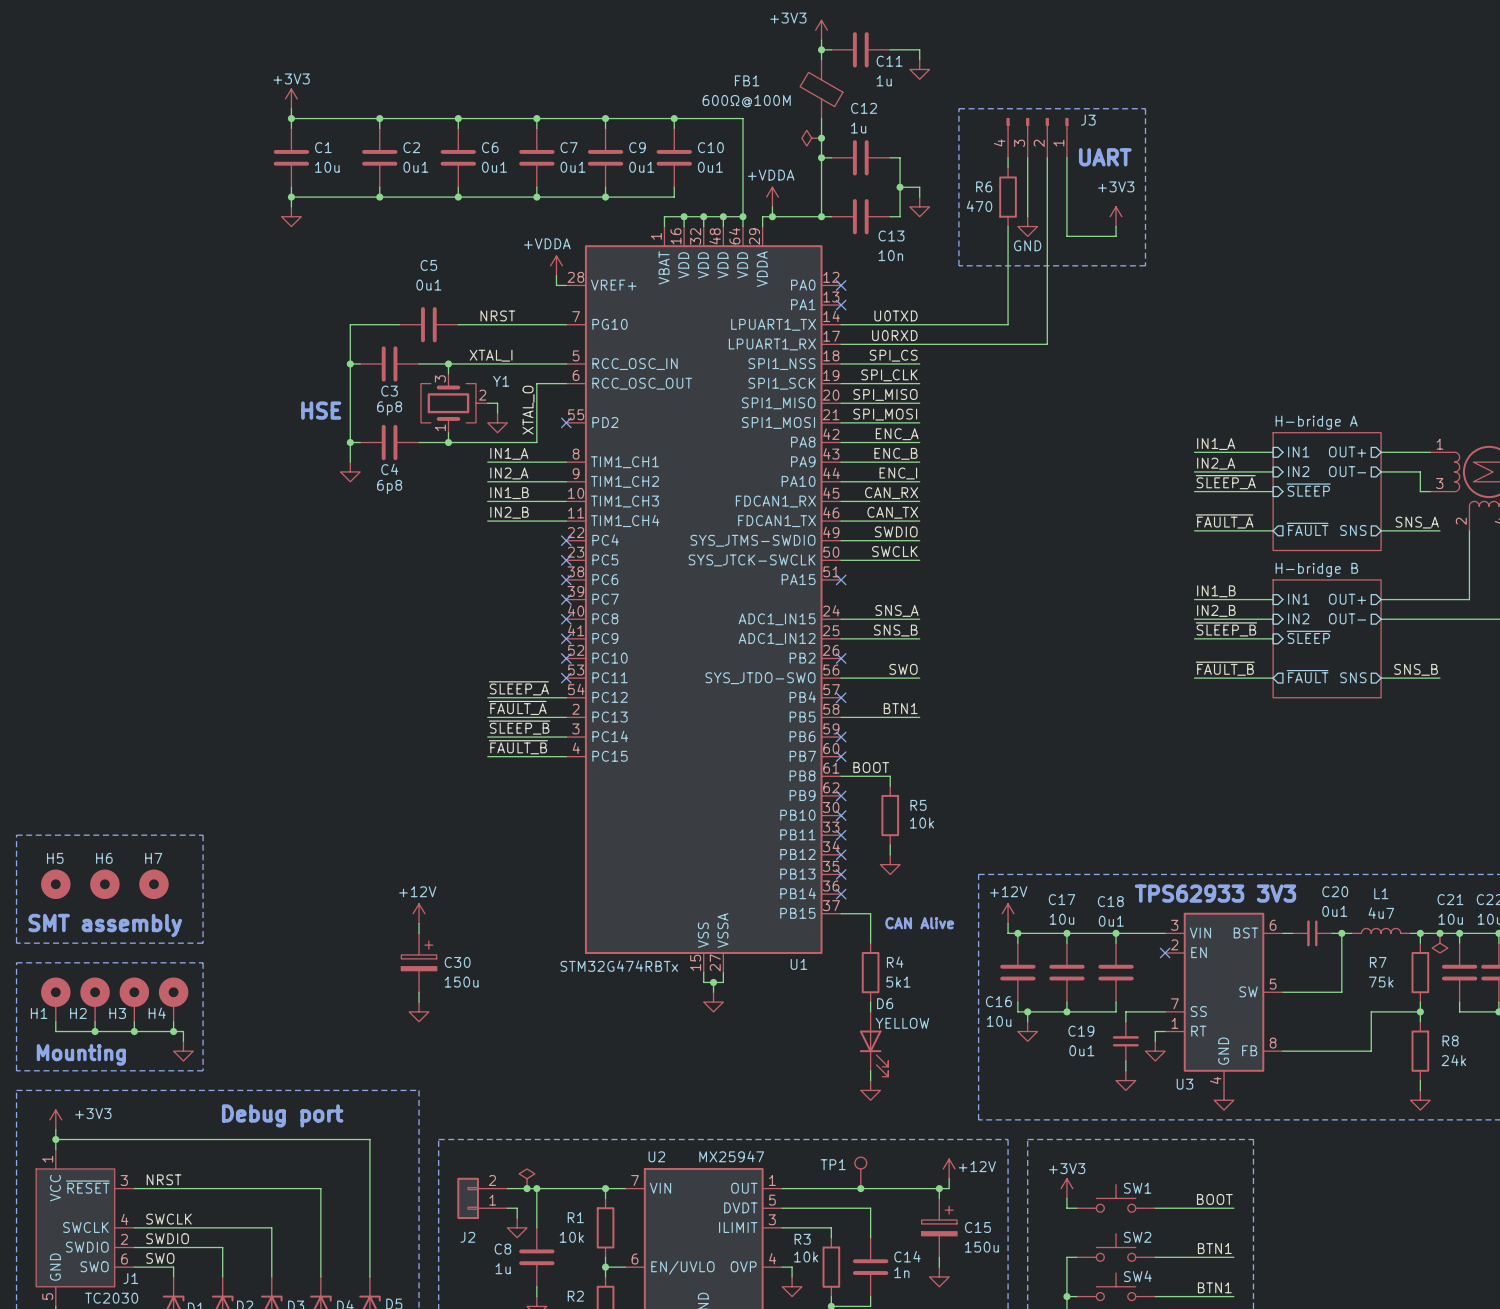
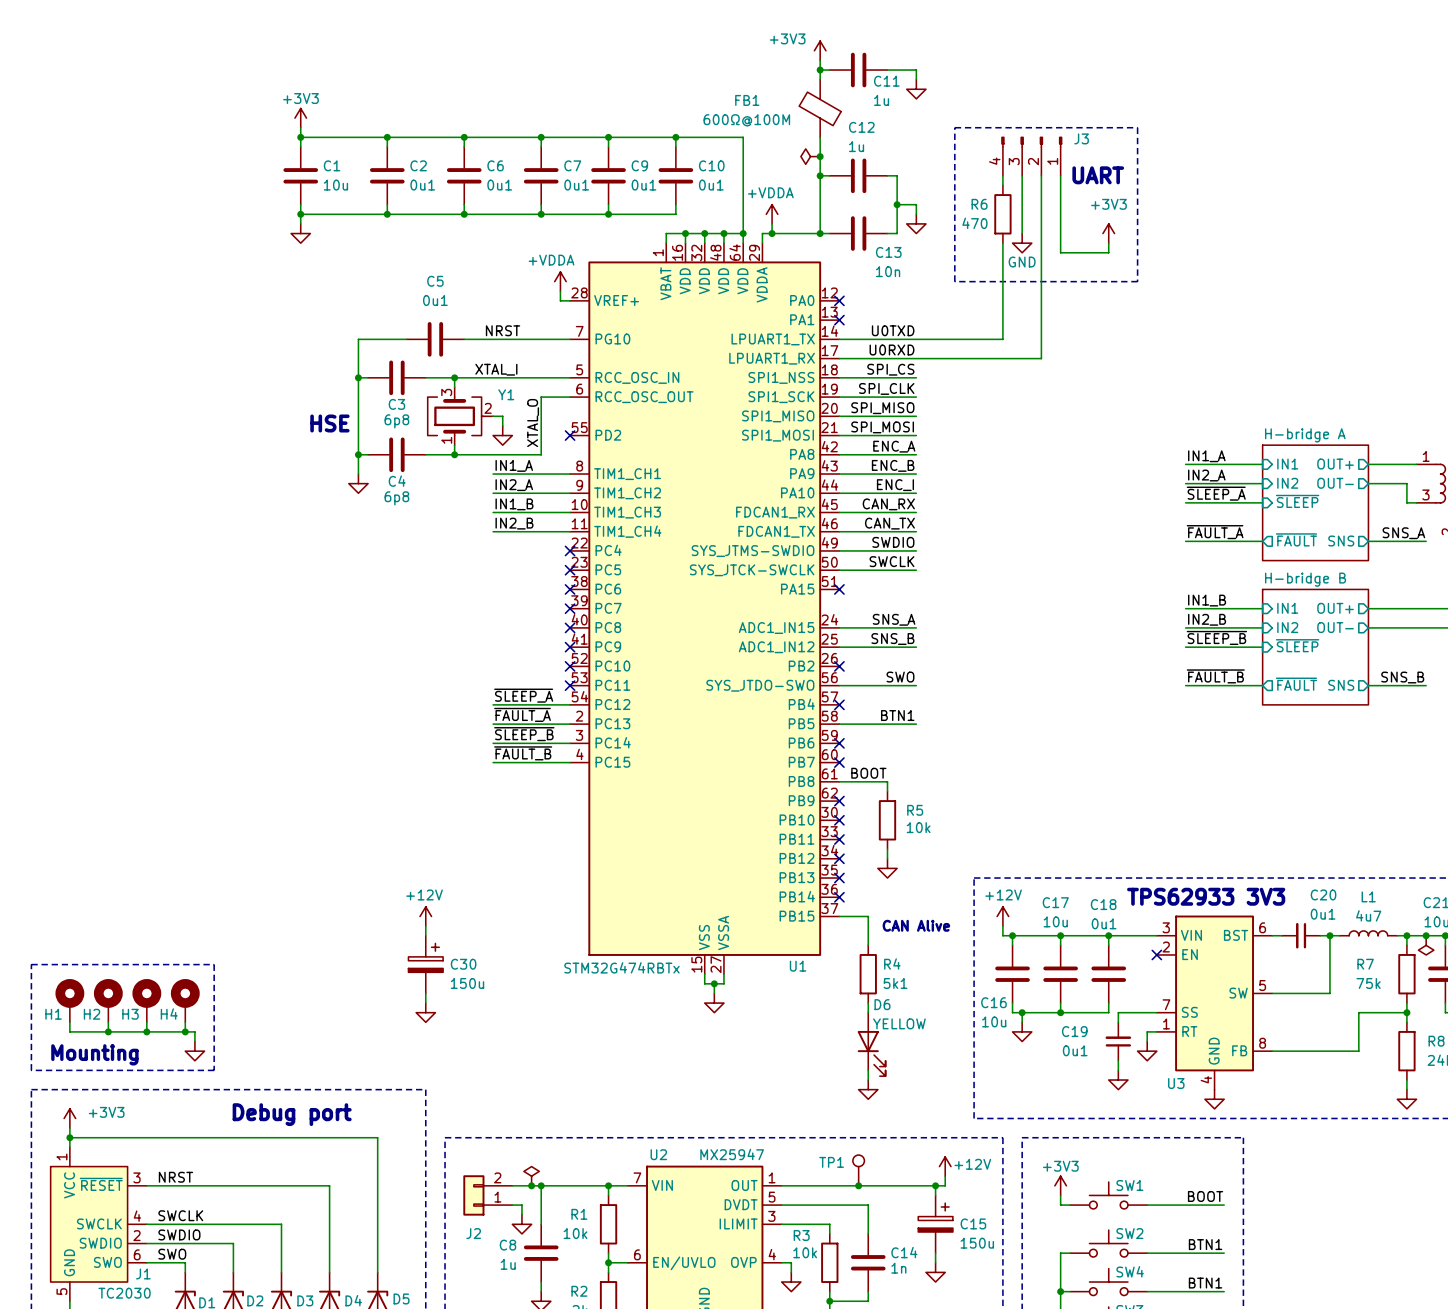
line: (16, 835) (203, 835) (203, 943) (16, 943) (16, 835) -> none
H5: (55, 884) -> none
H6: (104, 884) -> none
H7: (153, 884) -> none
text: SMT assembly (105, 925) -> none

